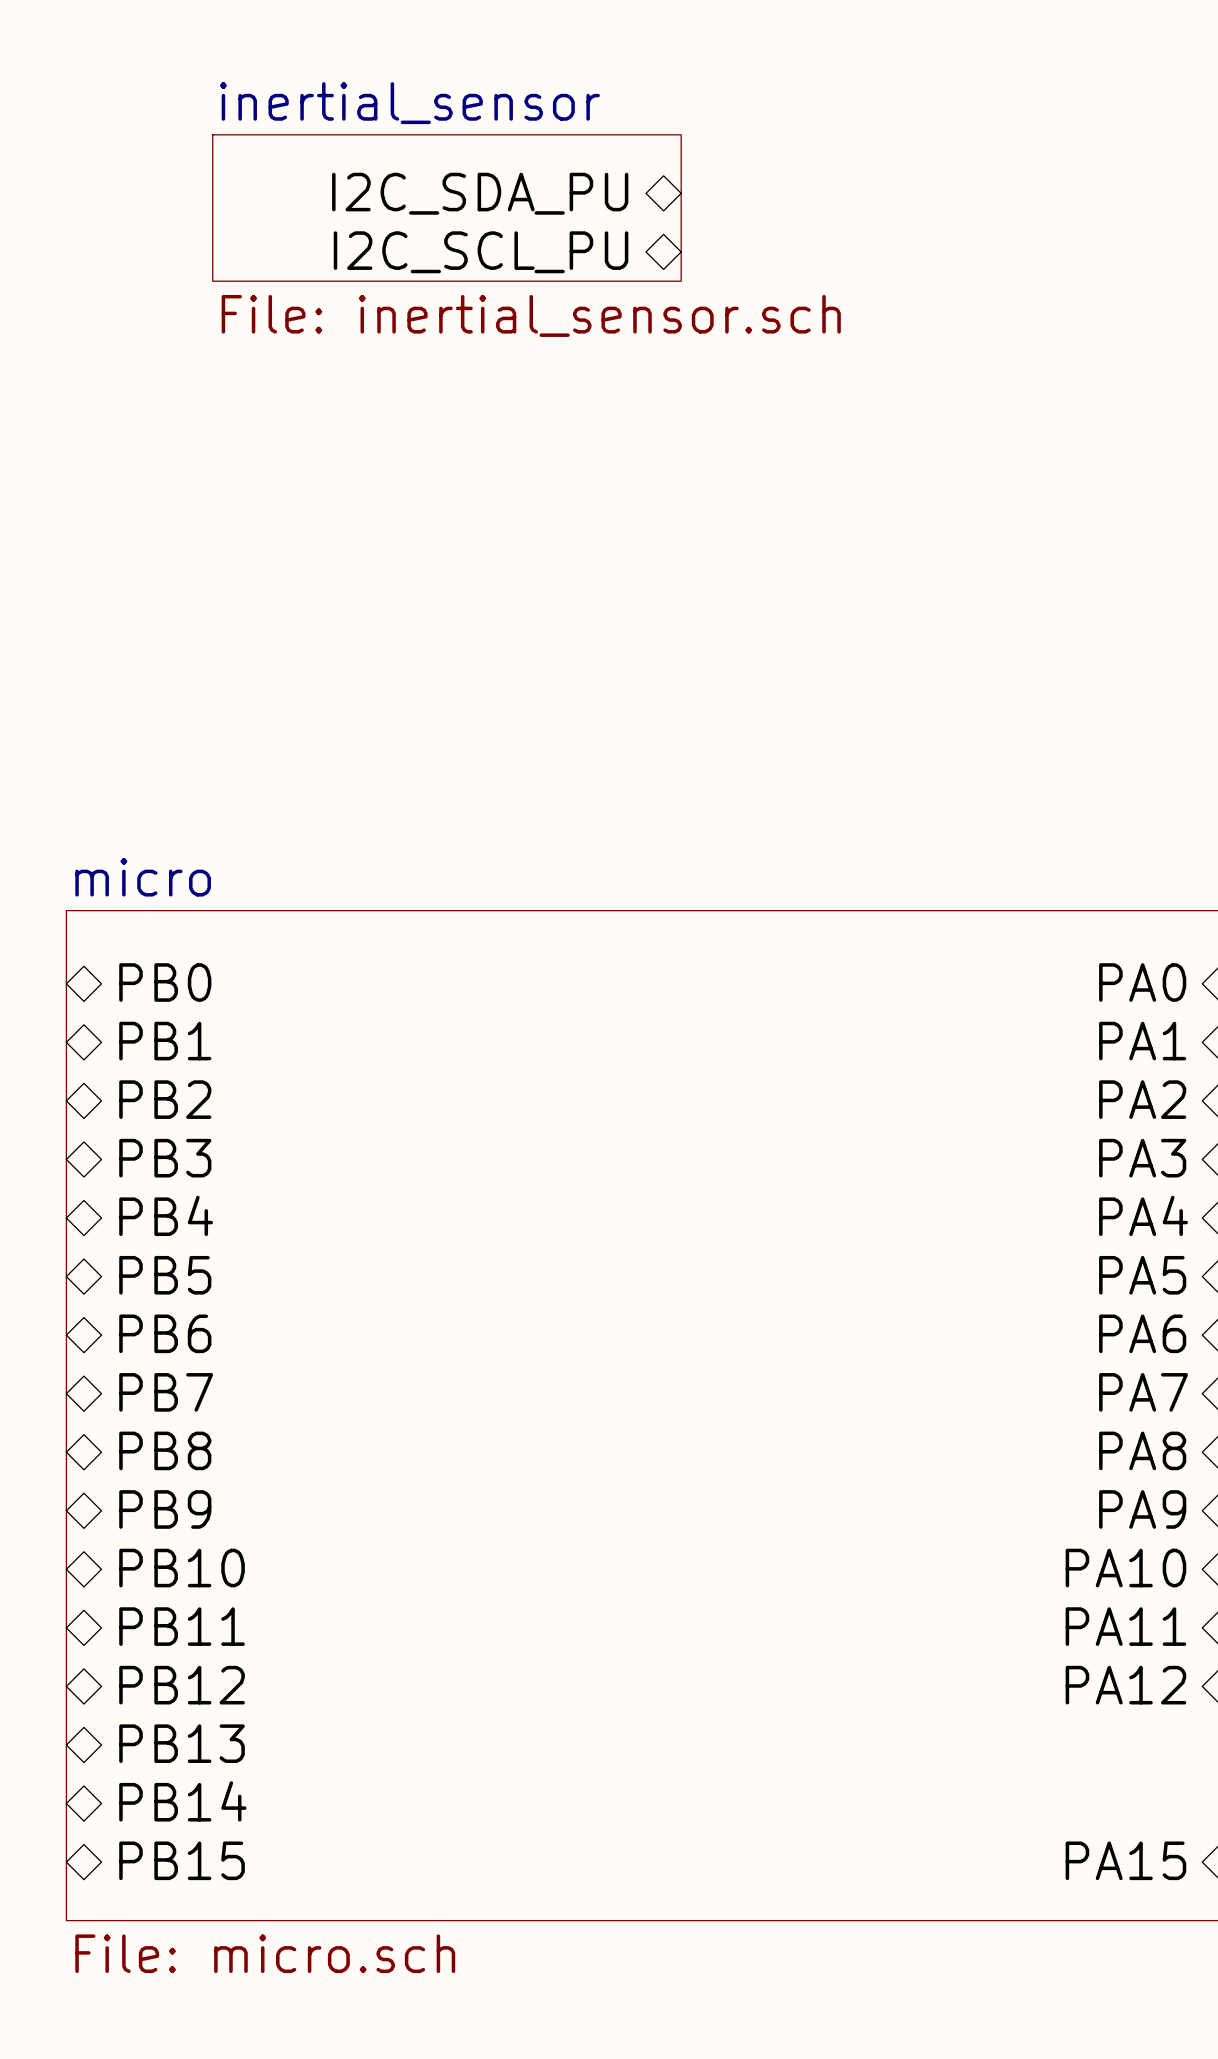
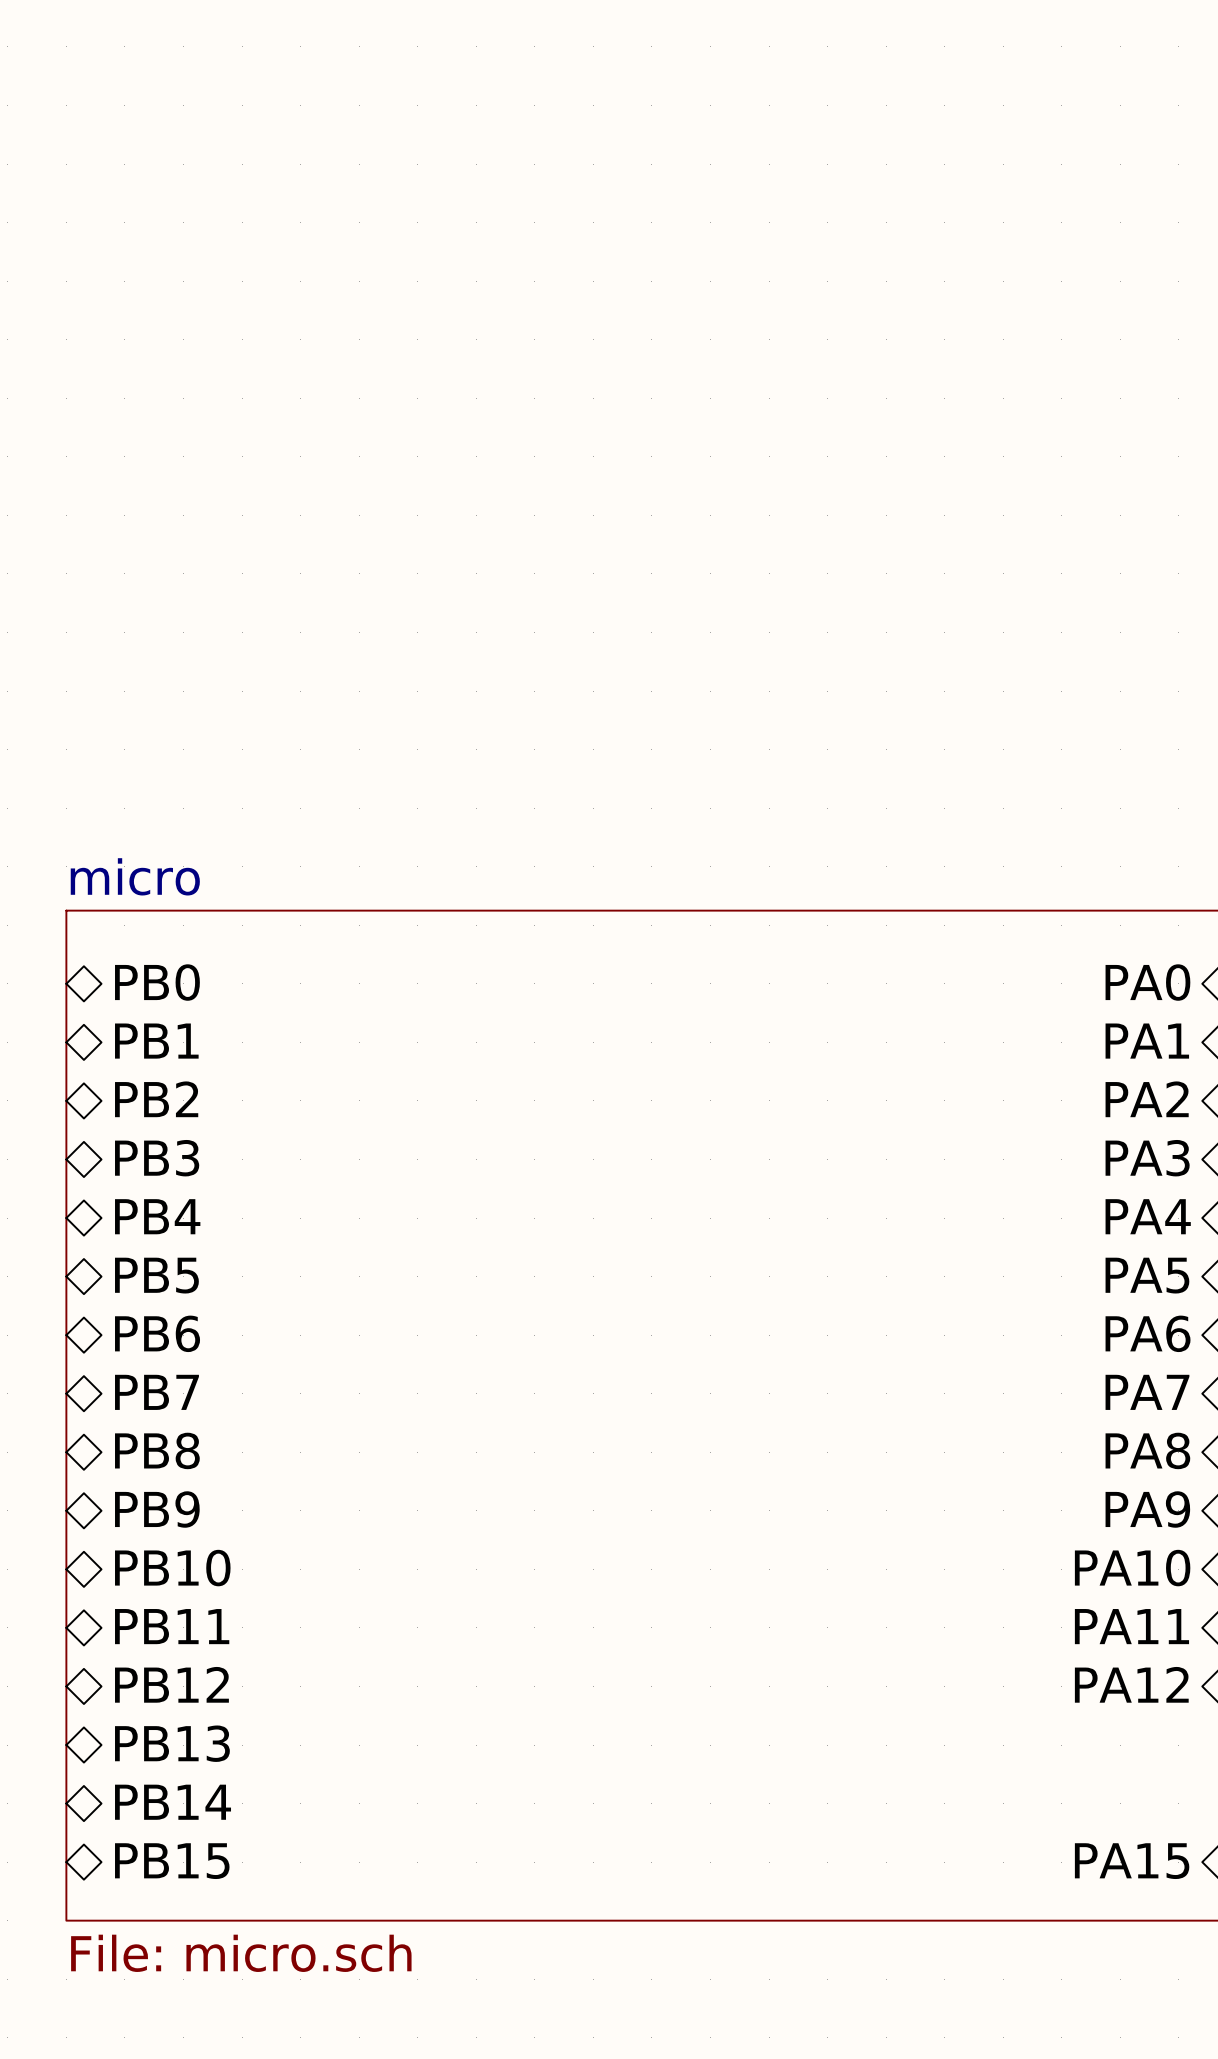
sheet pin: I2C_SDA_PU (480, 193) -> none
sheet inertial_sensor: File: inertial_sensor.sch (446, 208) -> none
sheet pin: I2C_SCL_PU (481, 252) -> none

